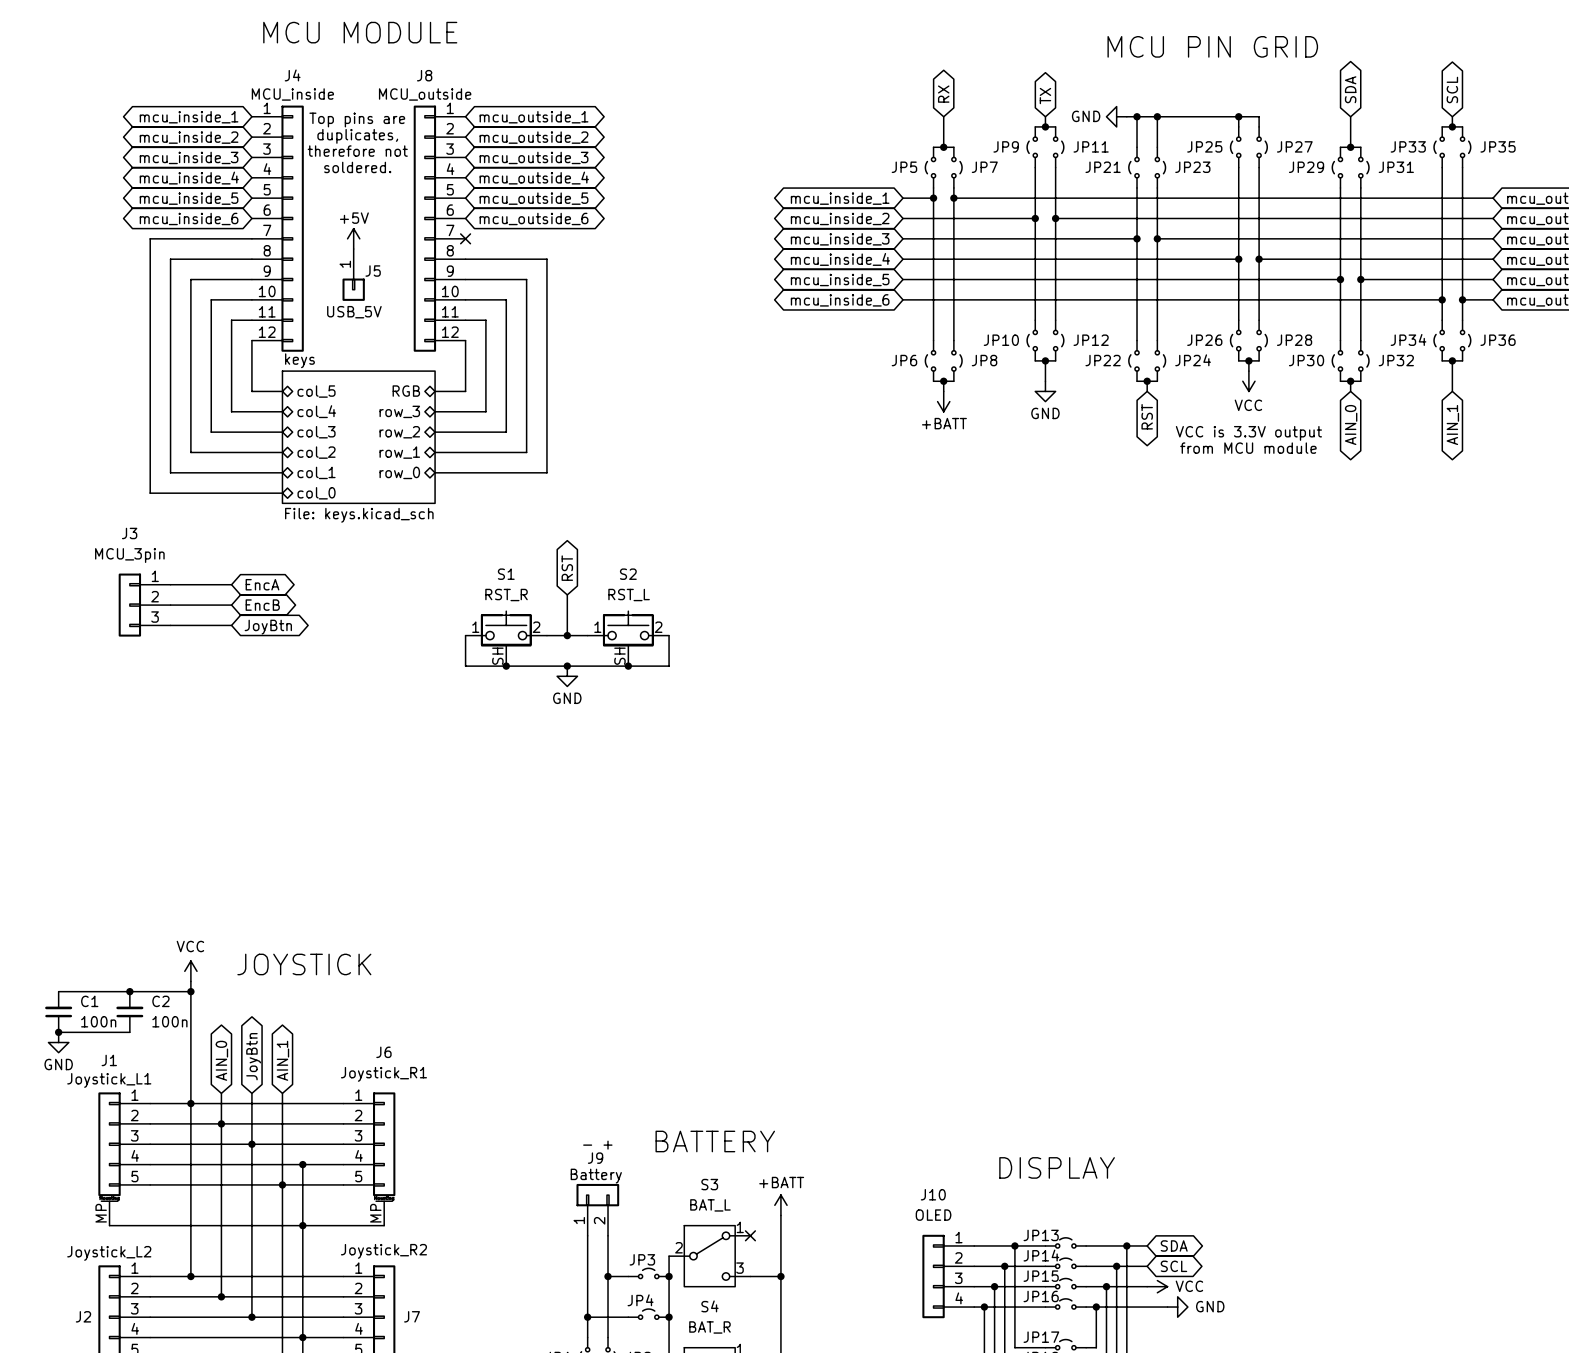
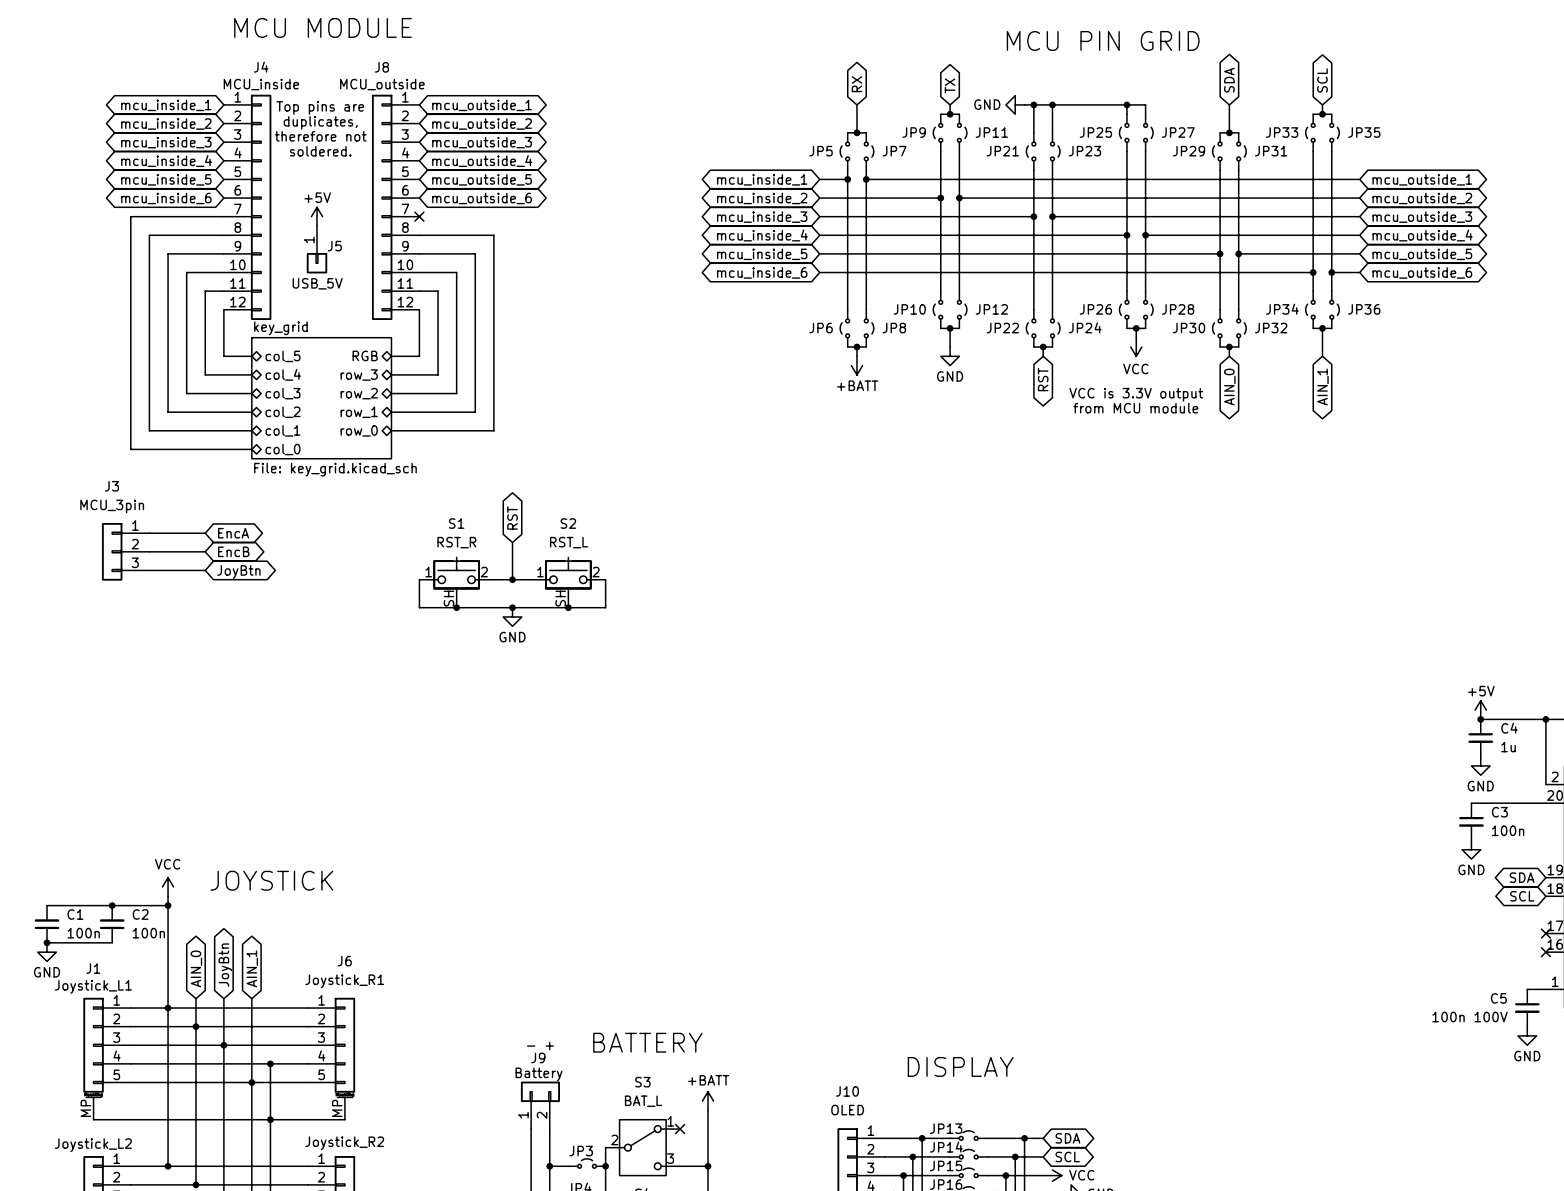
sheet keys name: keys (299, 360) -> key_grid (280, 328)
sheet keys value: File: keys.kicad_sch (359, 515) -> File: key_grid.kicad_sch (335, 469)

